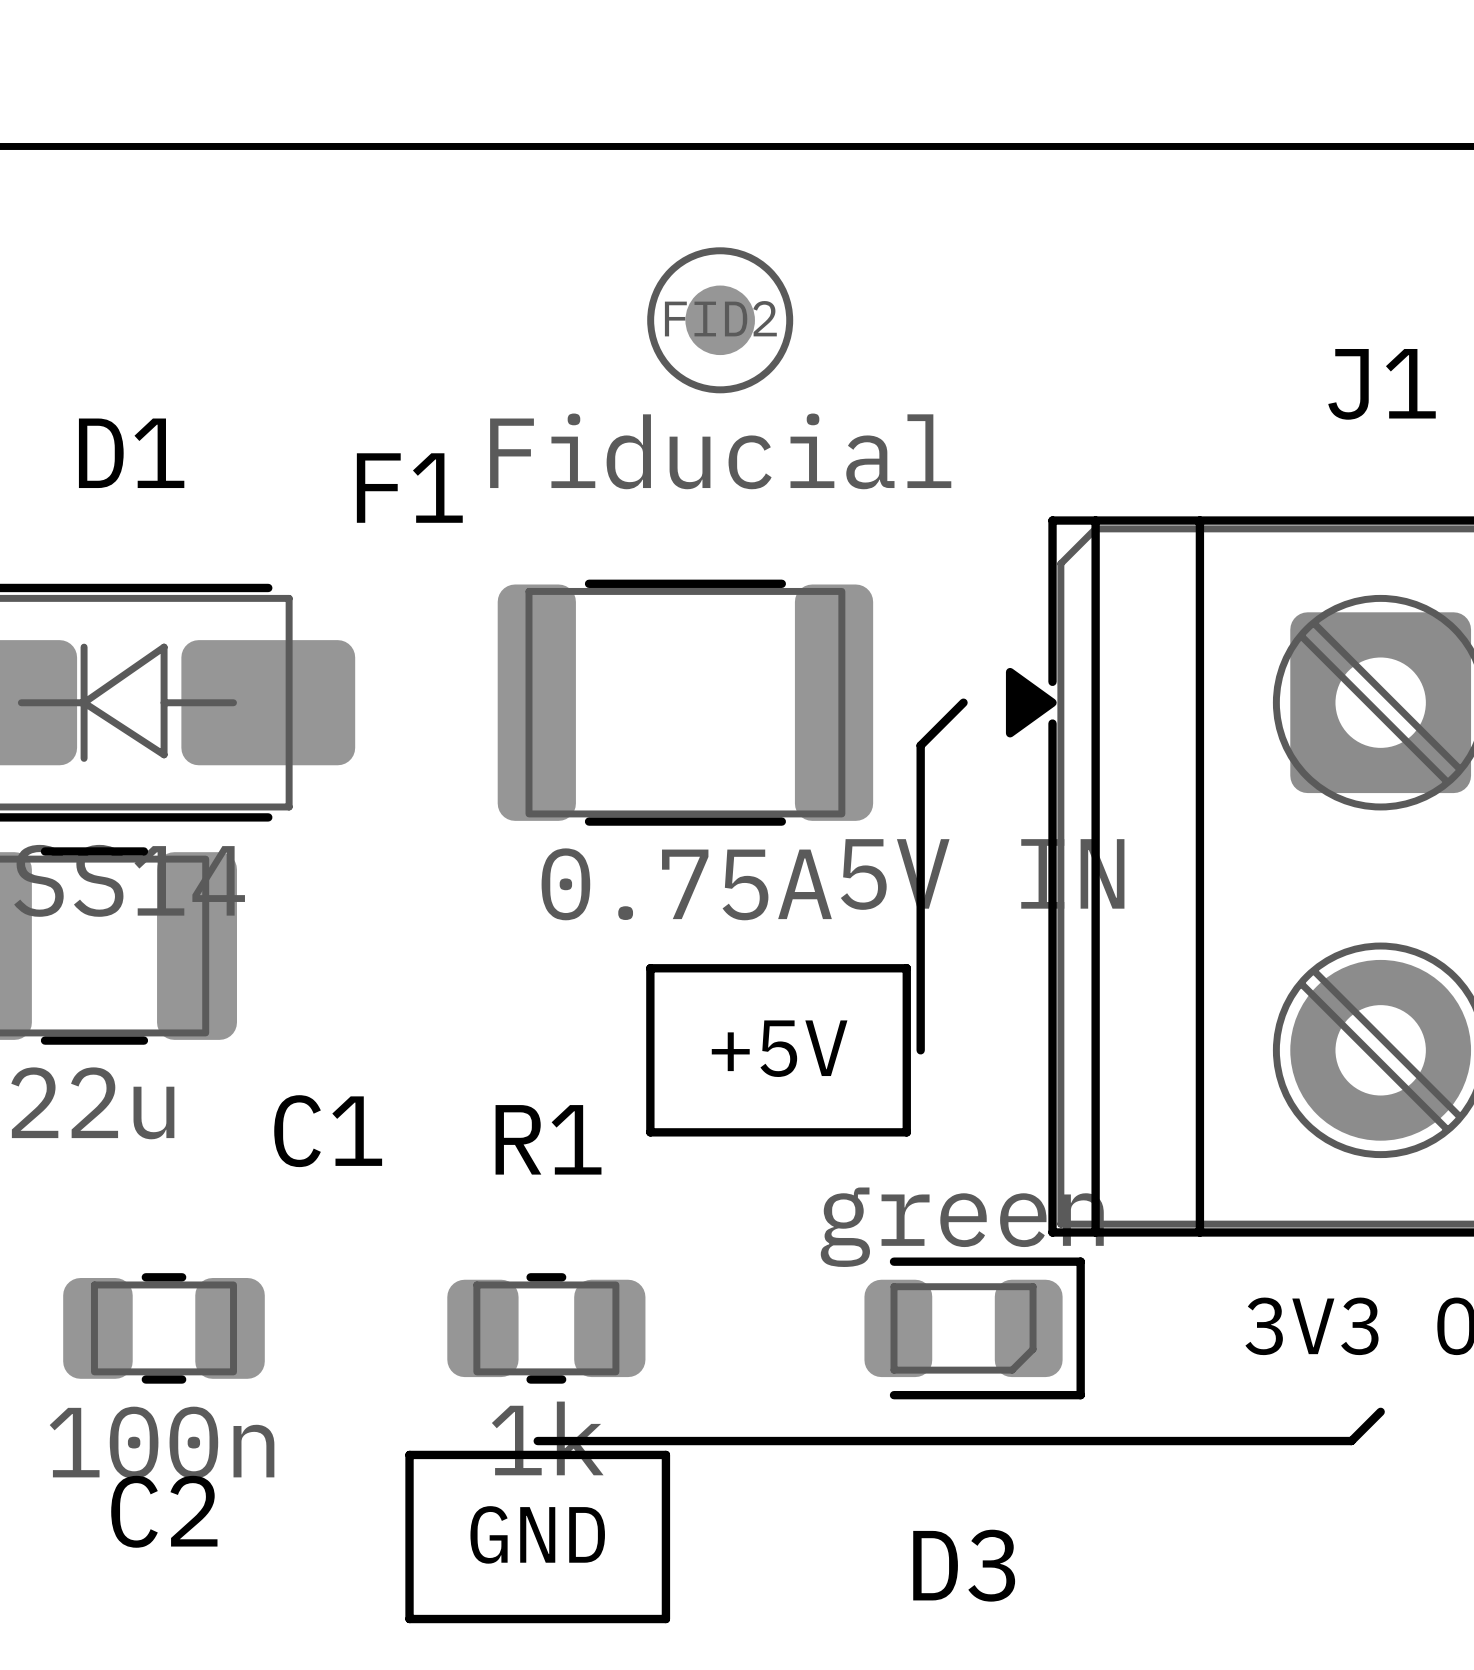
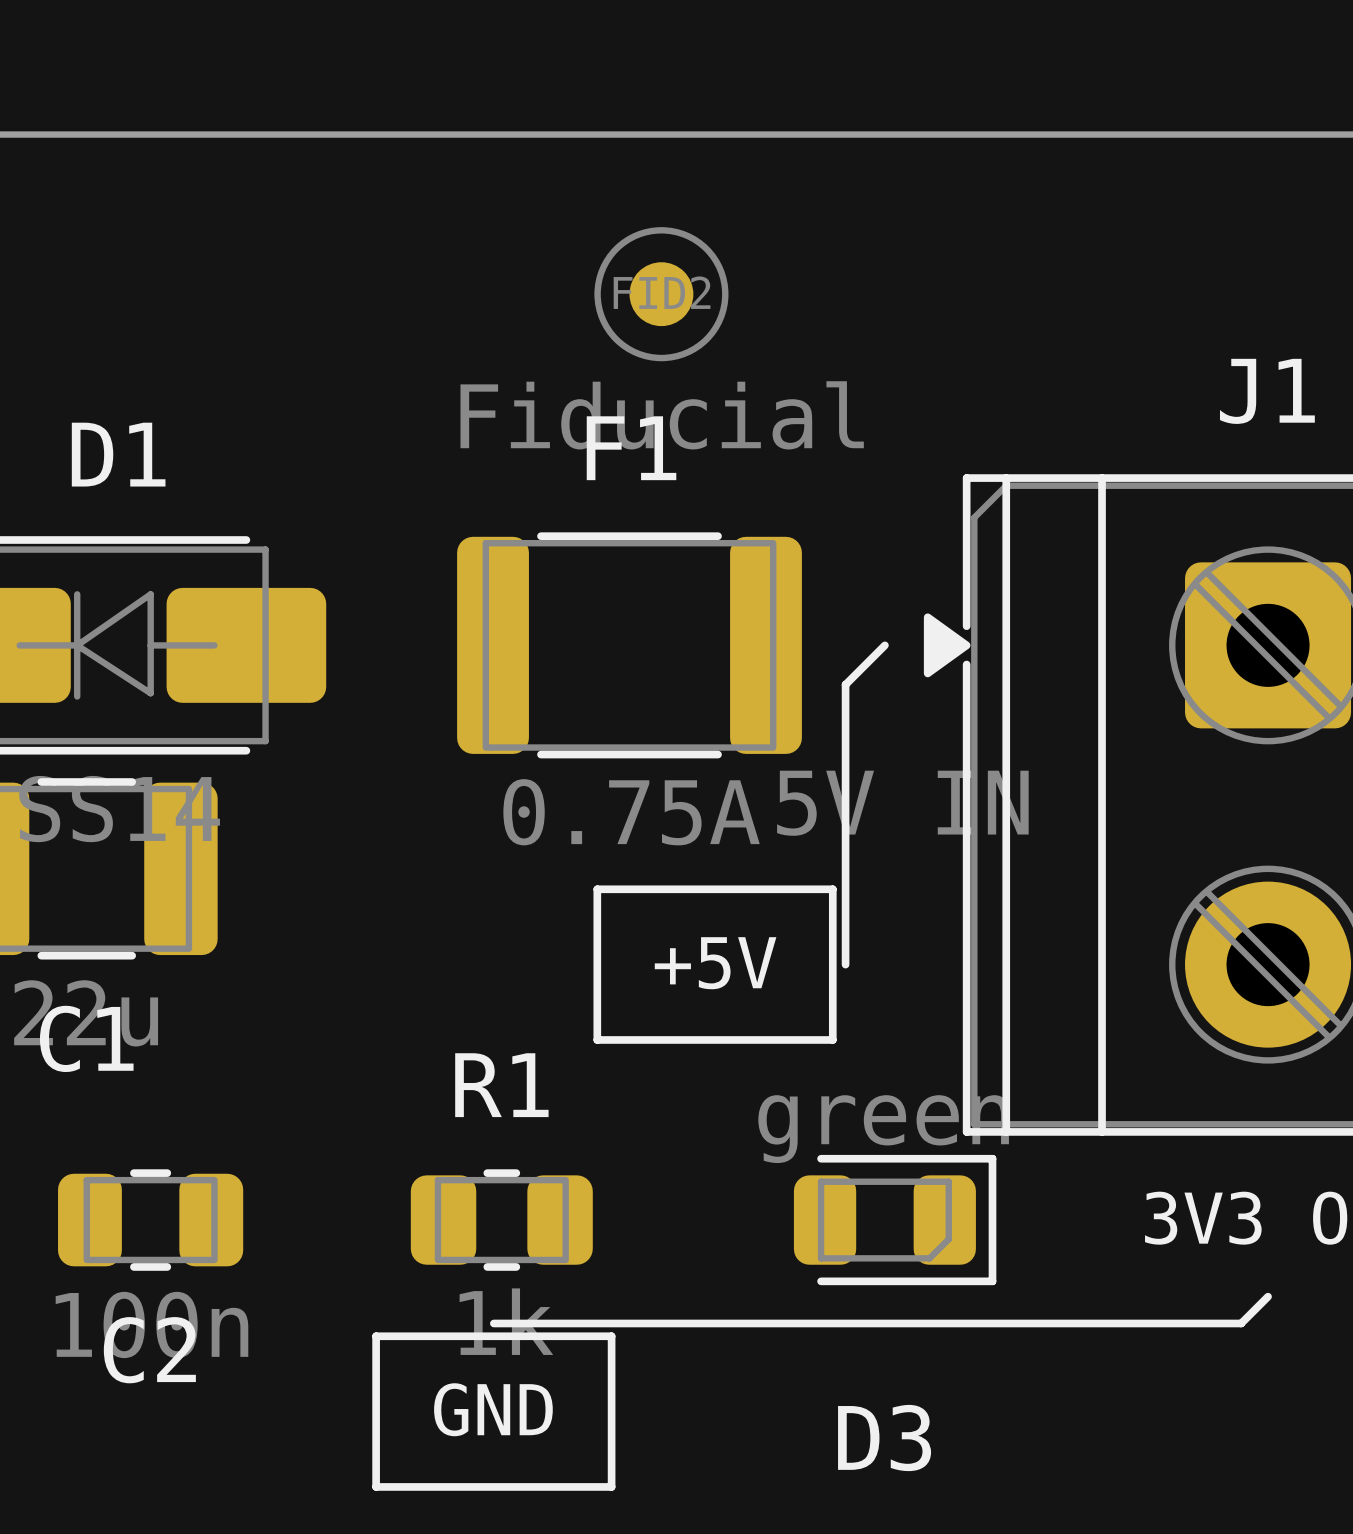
J1 name position: J1 (1382, 384) -> J1 (1267, 391)
D1 name position: D1 (131, 453) -> D1 (118, 454)
F1 name position: F1 (409, 488) -> F1 (631, 448)
C1 name position: C1 (328, 1131) -> C1 (86, 1038)
R1 name position: R1 (548, 1139) -> R1 (501, 1085)
C2 name position: C2 (164, 1511) -> C2 (149, 1350)

